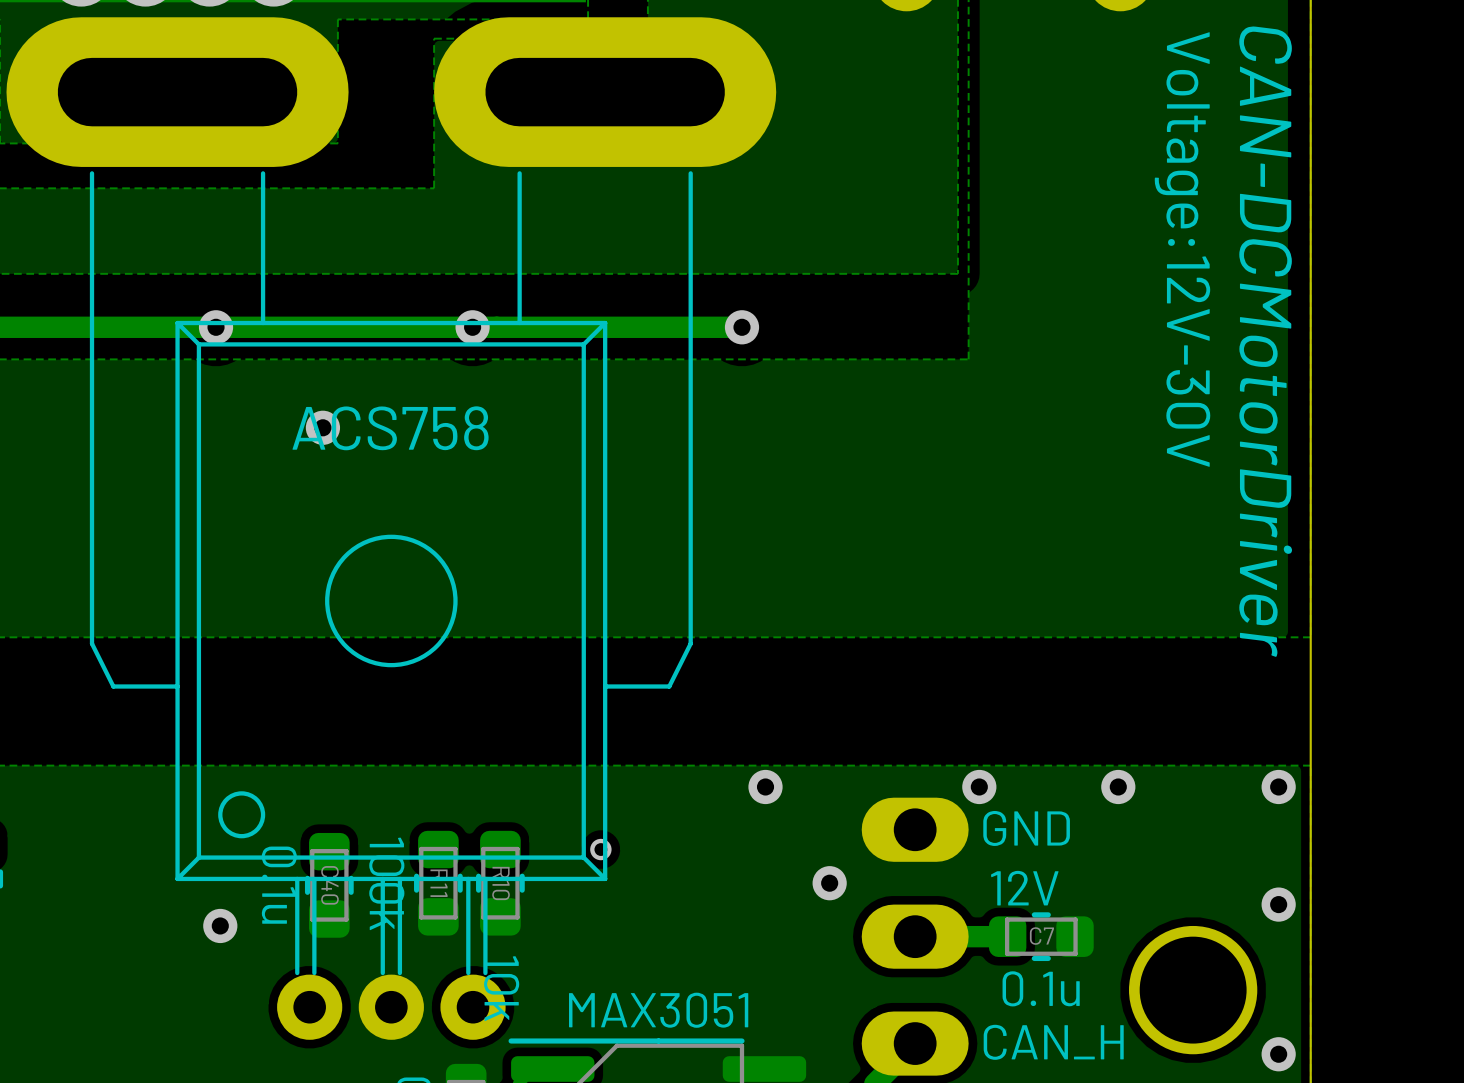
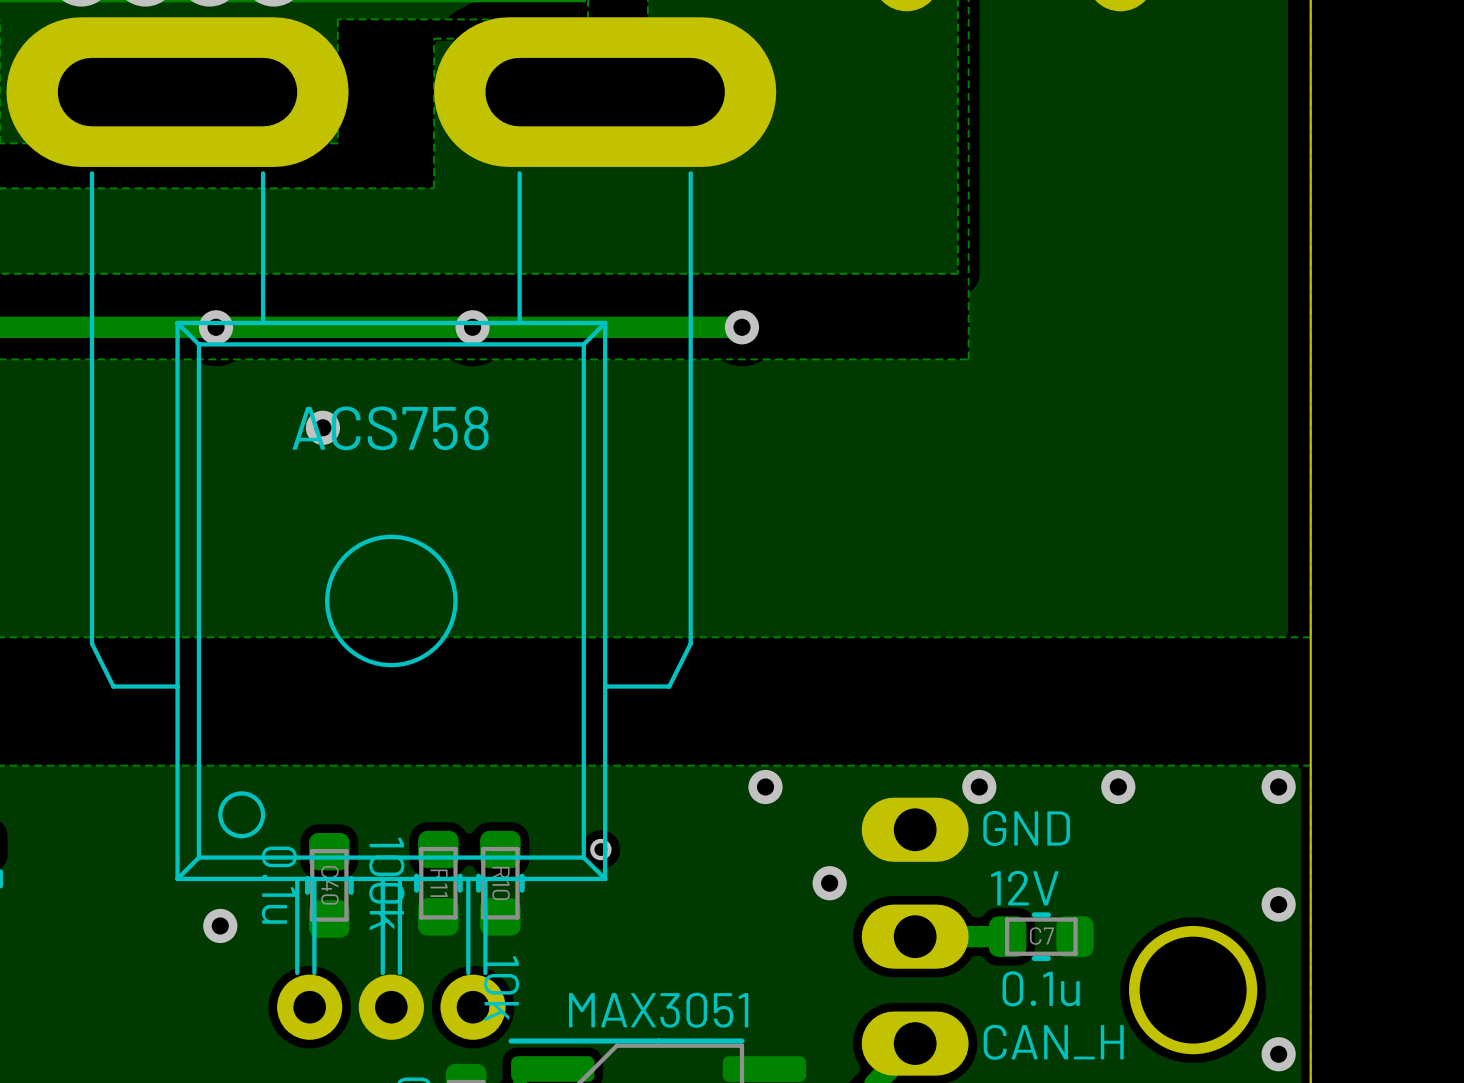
text: Voltage:12V-30V (1182, 249) -> none
text: CAN-DCMotorDriver (1265, 341) -> none

